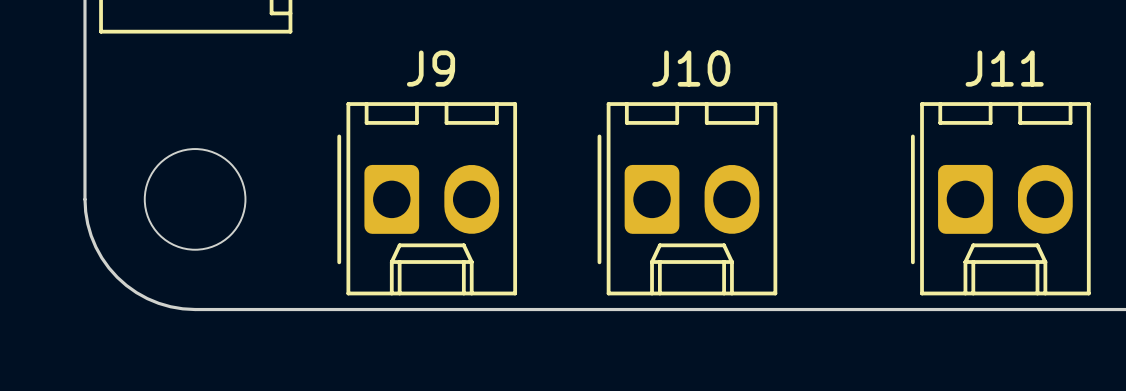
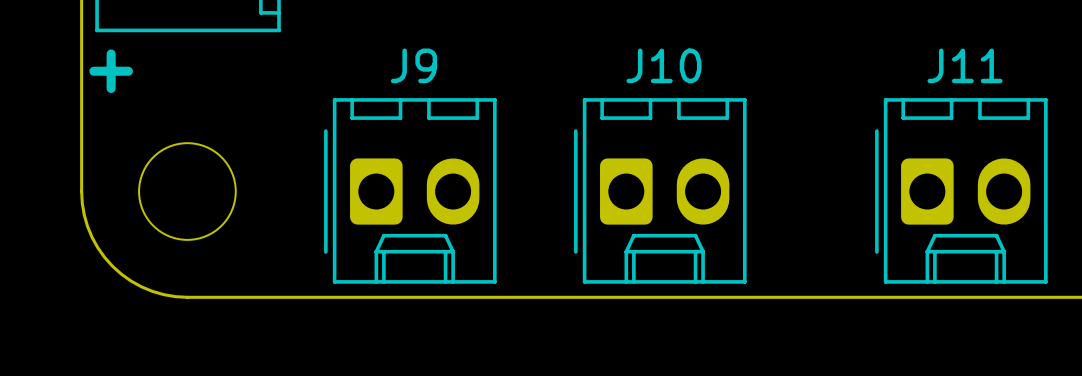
text: none -> + (111, 71)

